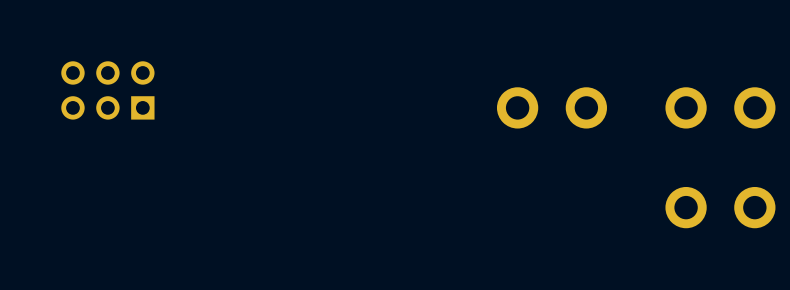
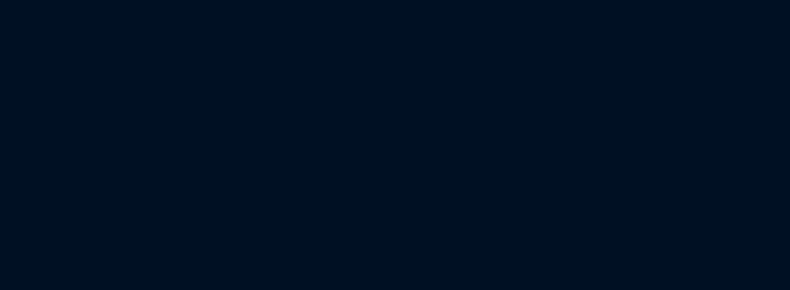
part: (107, 90) -> none
part: (551, 107) -> none
part: (720, 107) -> none
part: (720, 207) -> none

